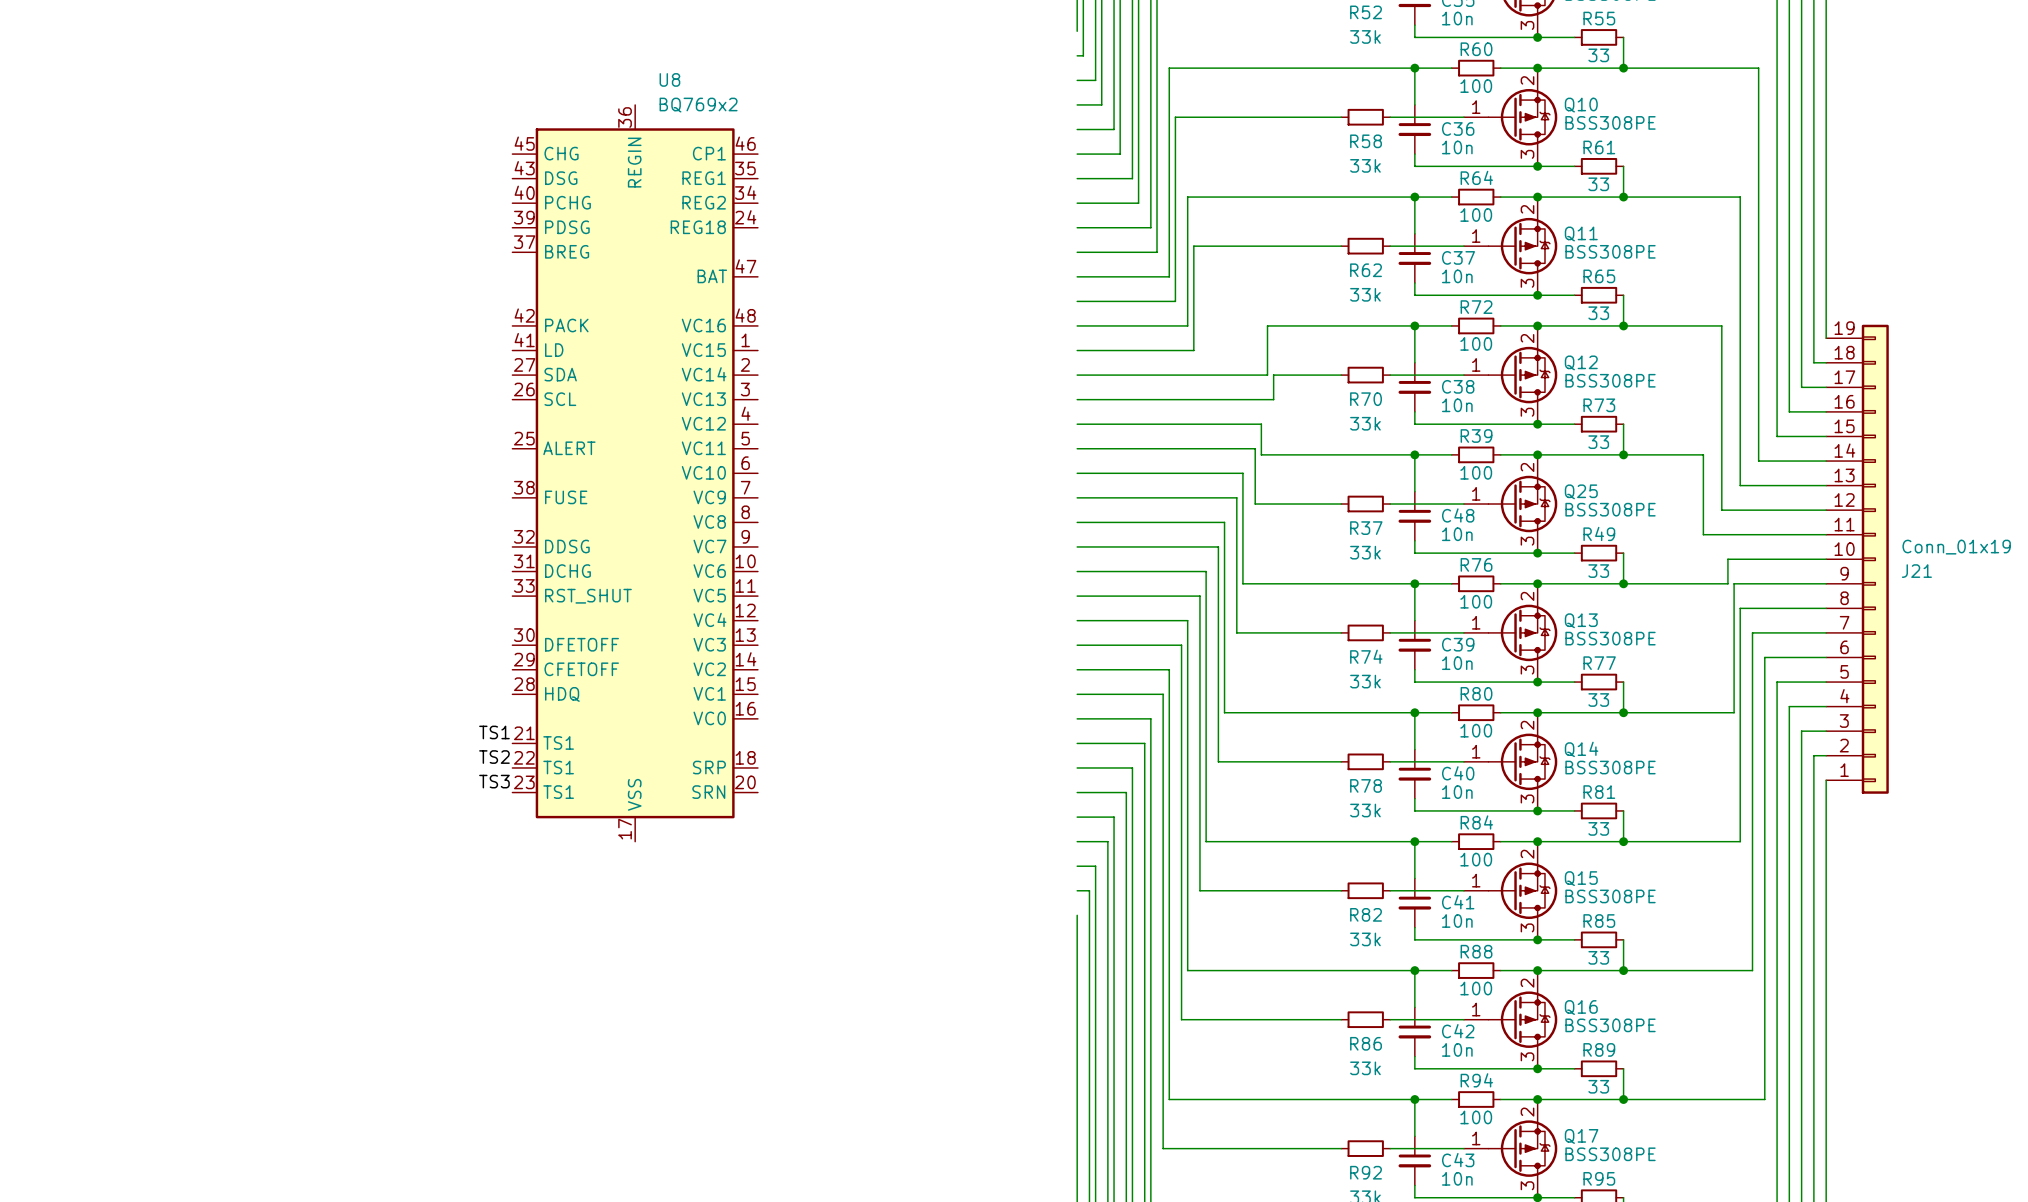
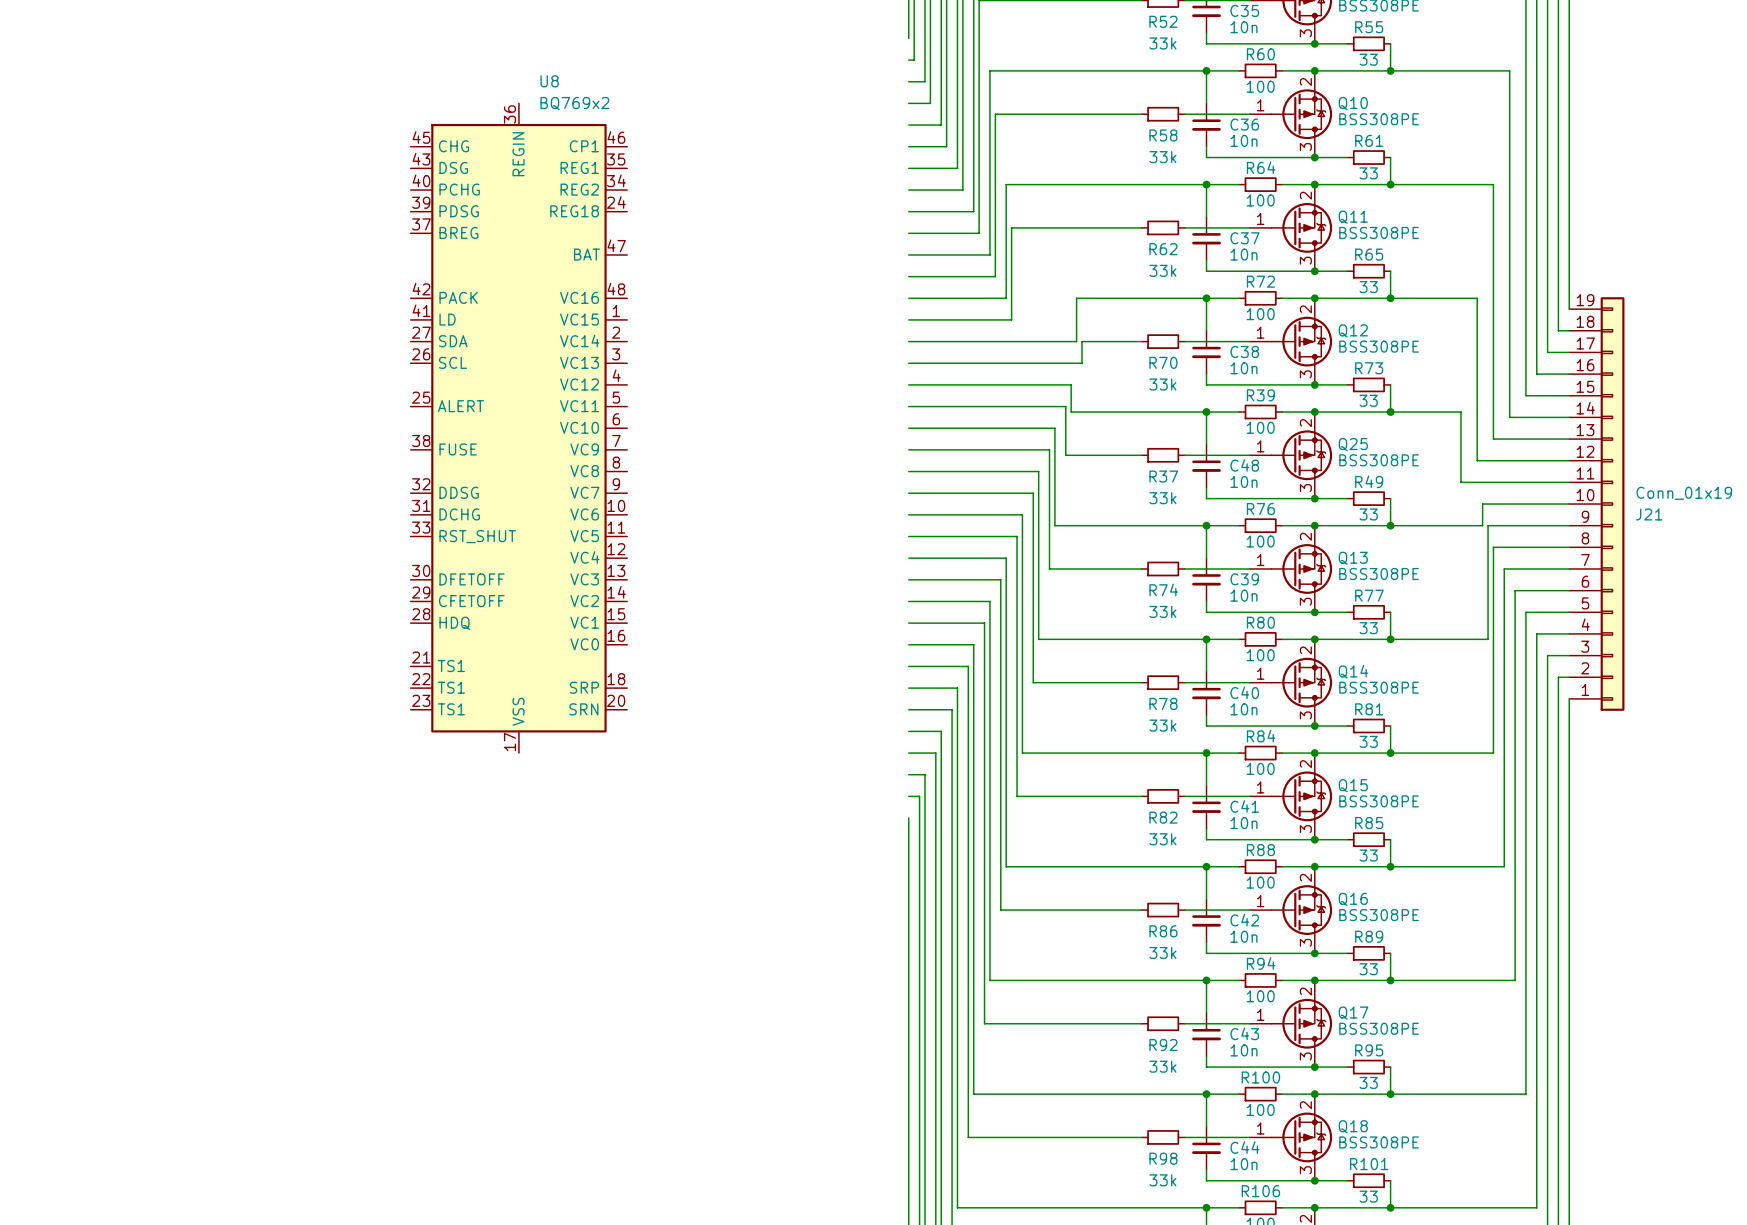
label: TS1 (494, 732) -> none
label: TS2 (494, 757) -> none
label: TS3 (494, 781) -> none

